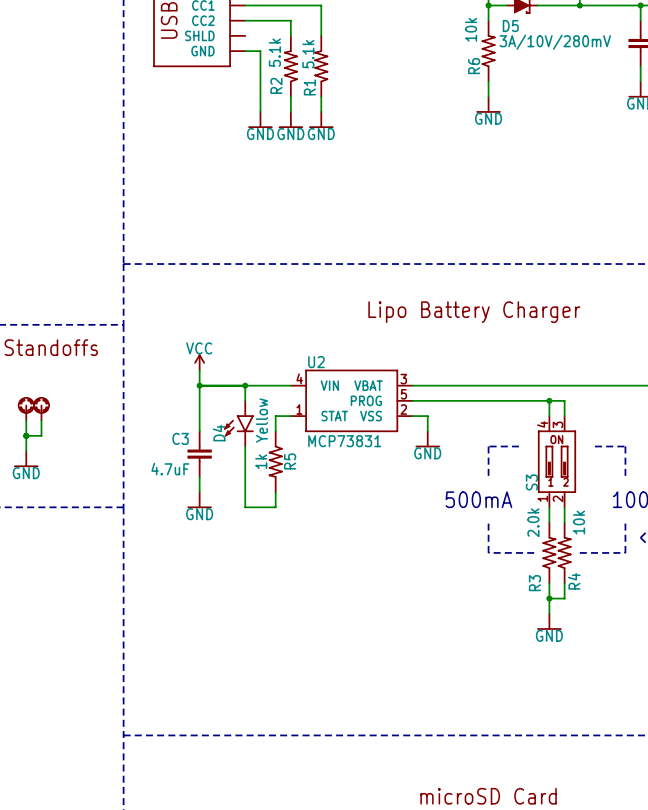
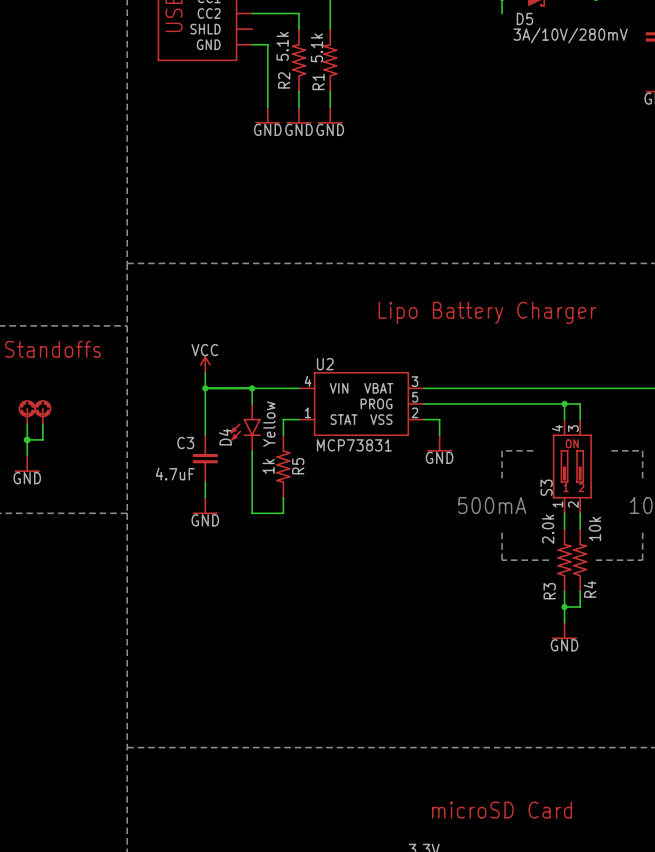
R6: 10k (488, 51) -> none
wire: (488, 81) (488, 96) -> none
power symbol: GND (488, 104) -> none

